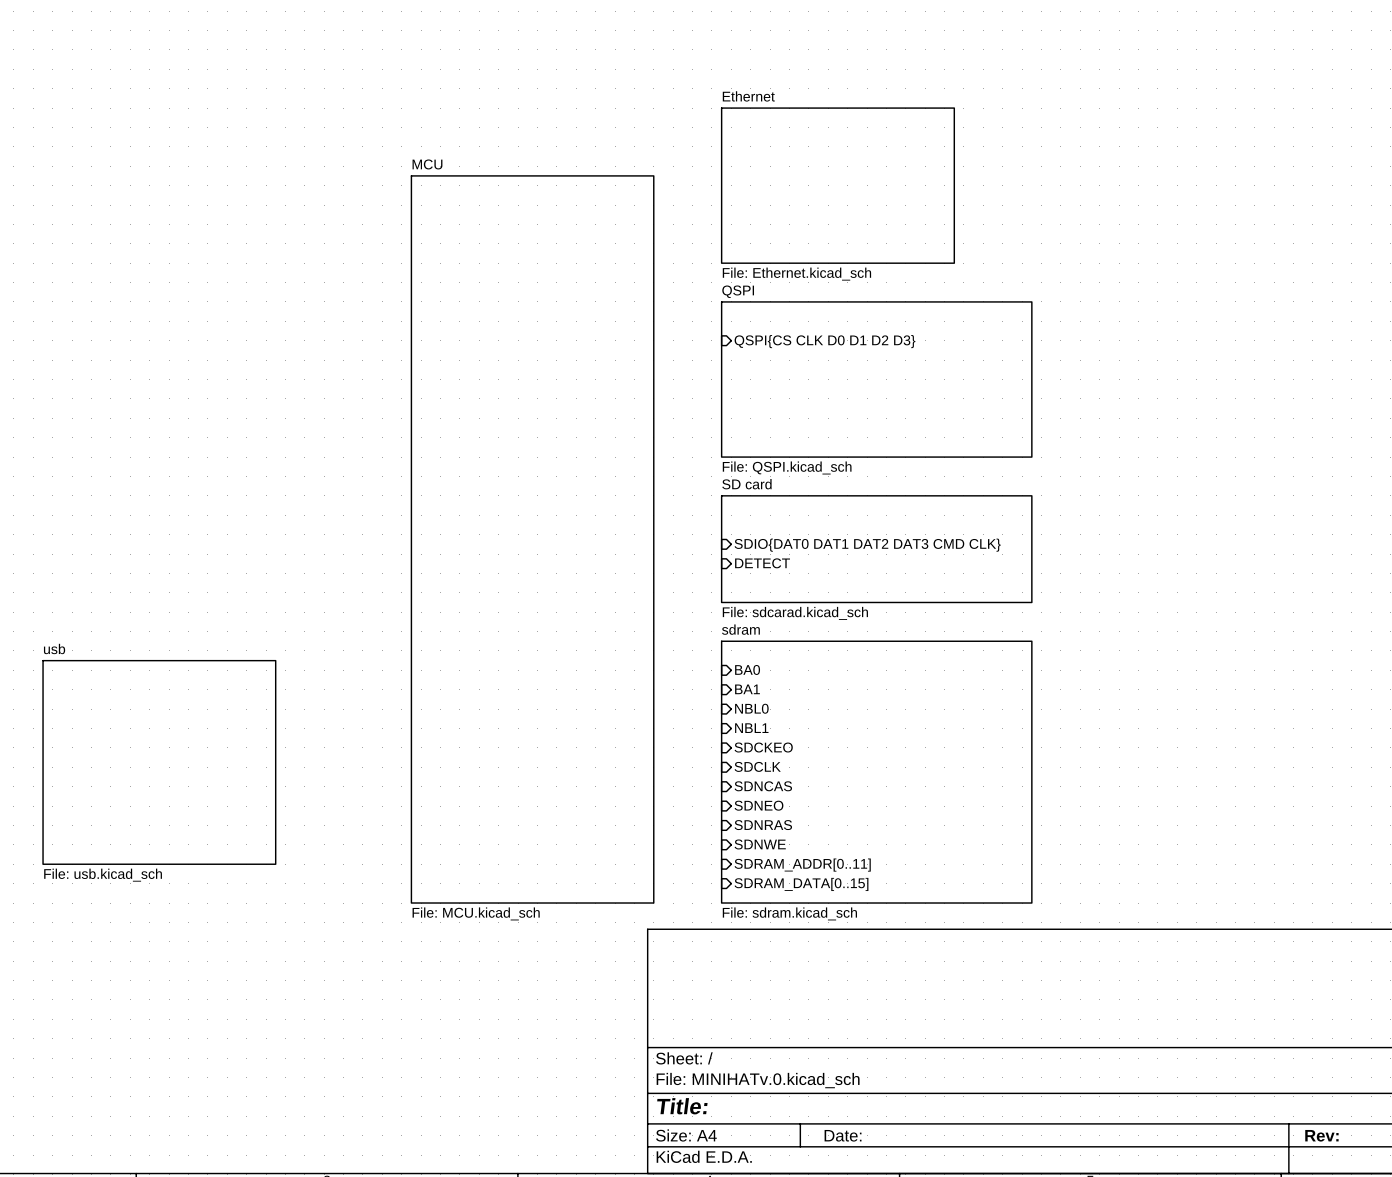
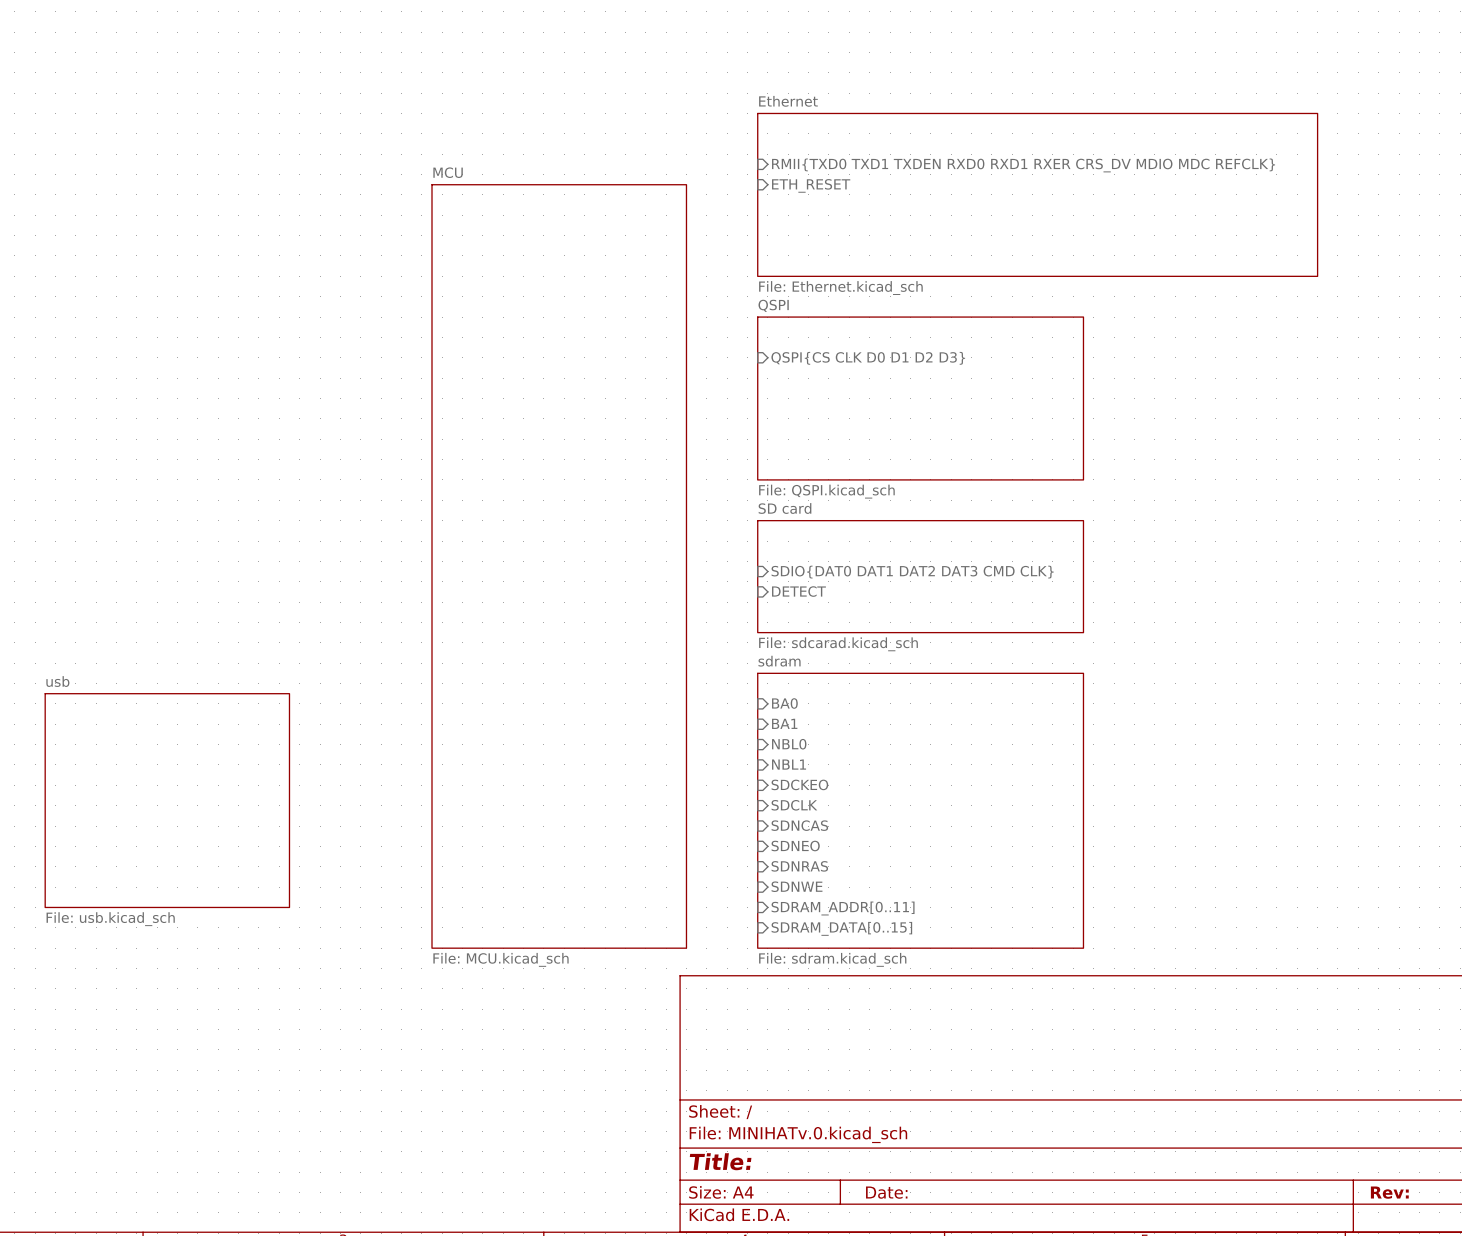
sheet pin: none -> RMII{TXD0 TXD1 TXDEN RXD0 RXD1 RXER CRS_DV MDIO MDC REFCLK} (1023, 165)
sheet pin: none -> ETH_RESET (811, 185)
sheet Ethernet: File: Ethernet.kicad_sch (837, 185) -> none
sheet Ethernet: none -> File: Ethernet.kicad_sch (1037, 194)

